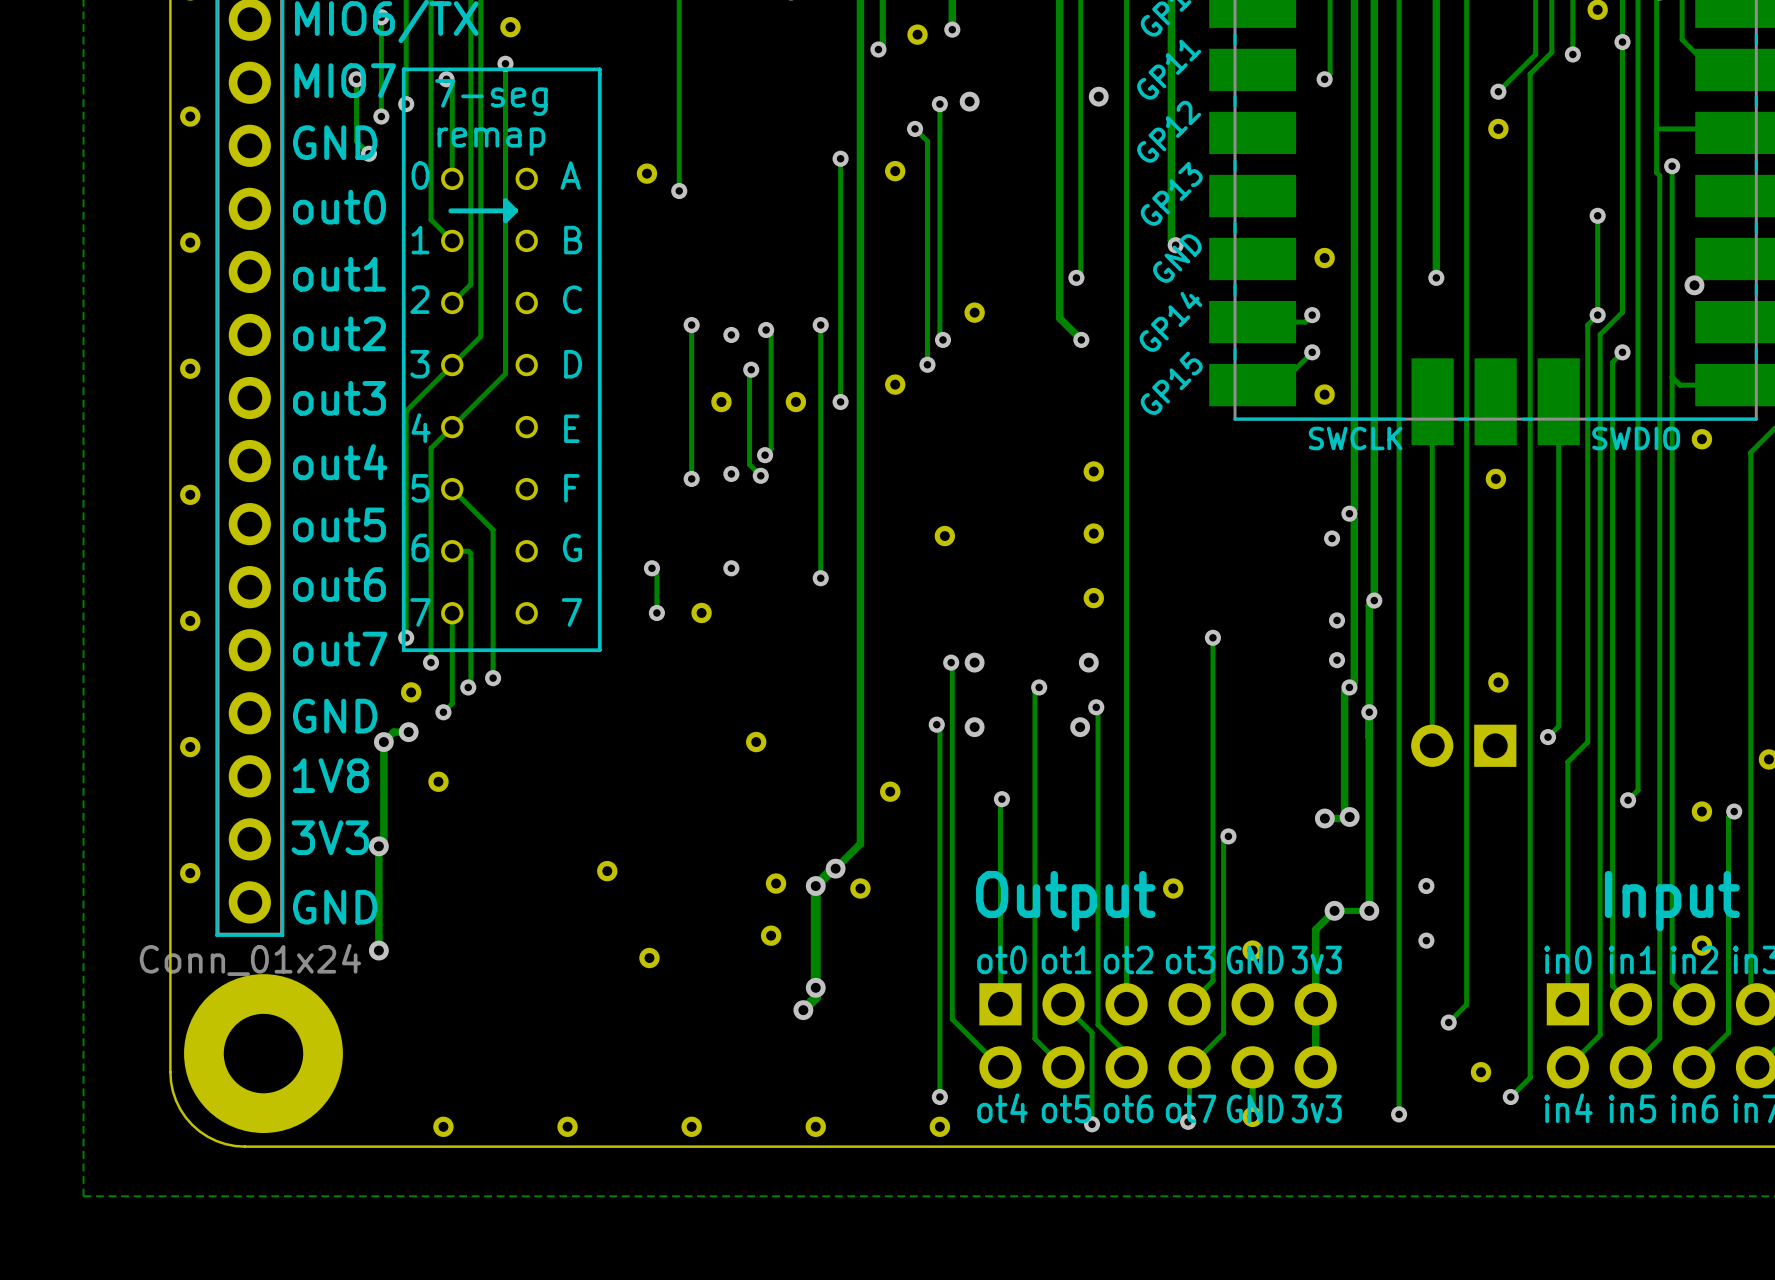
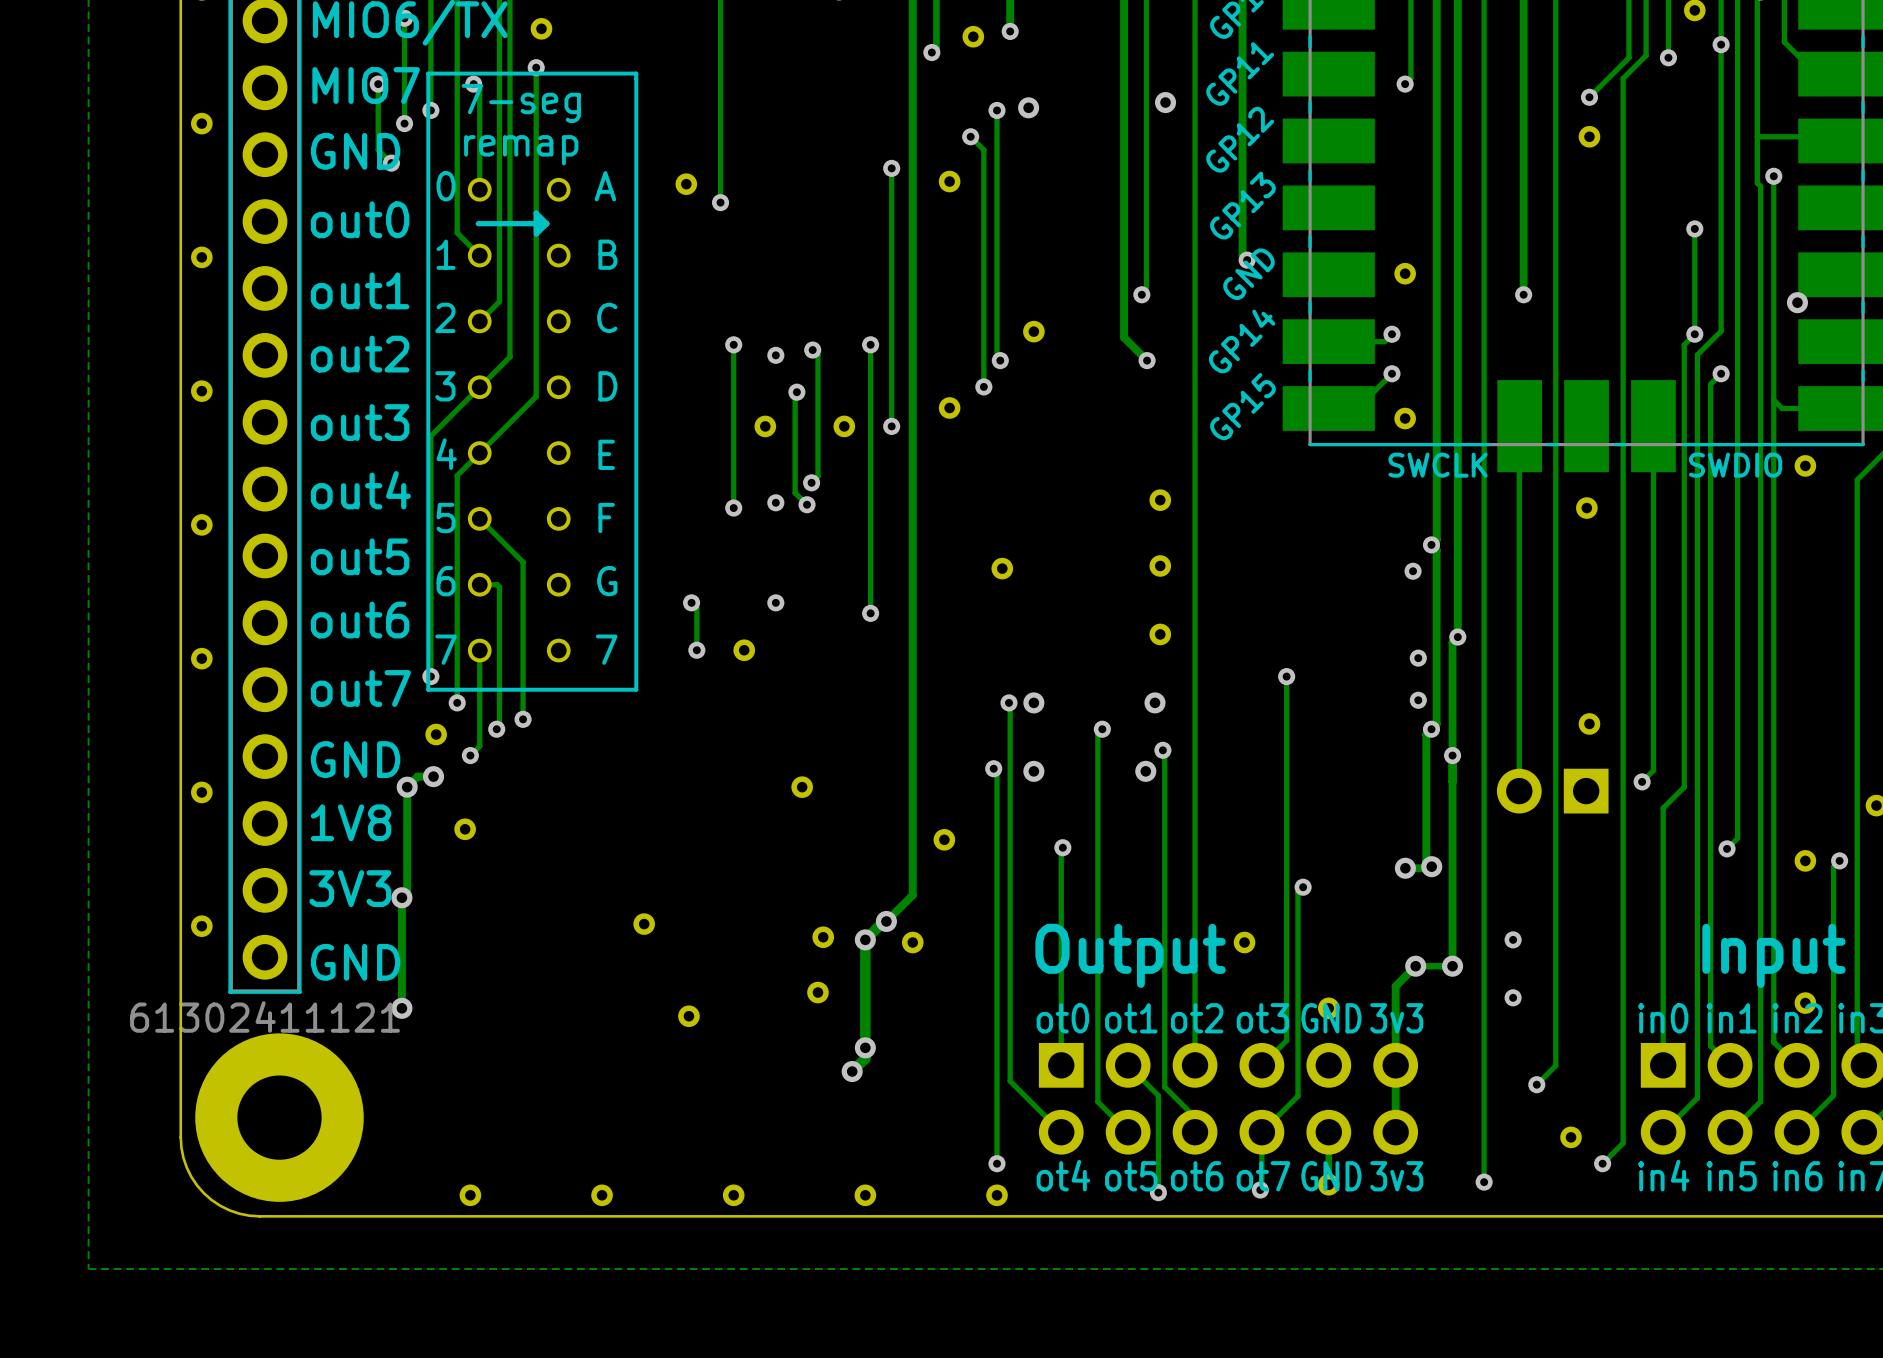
part value: Conn_01x24 (250, 959) -> 61302411121 (265, 1017)

